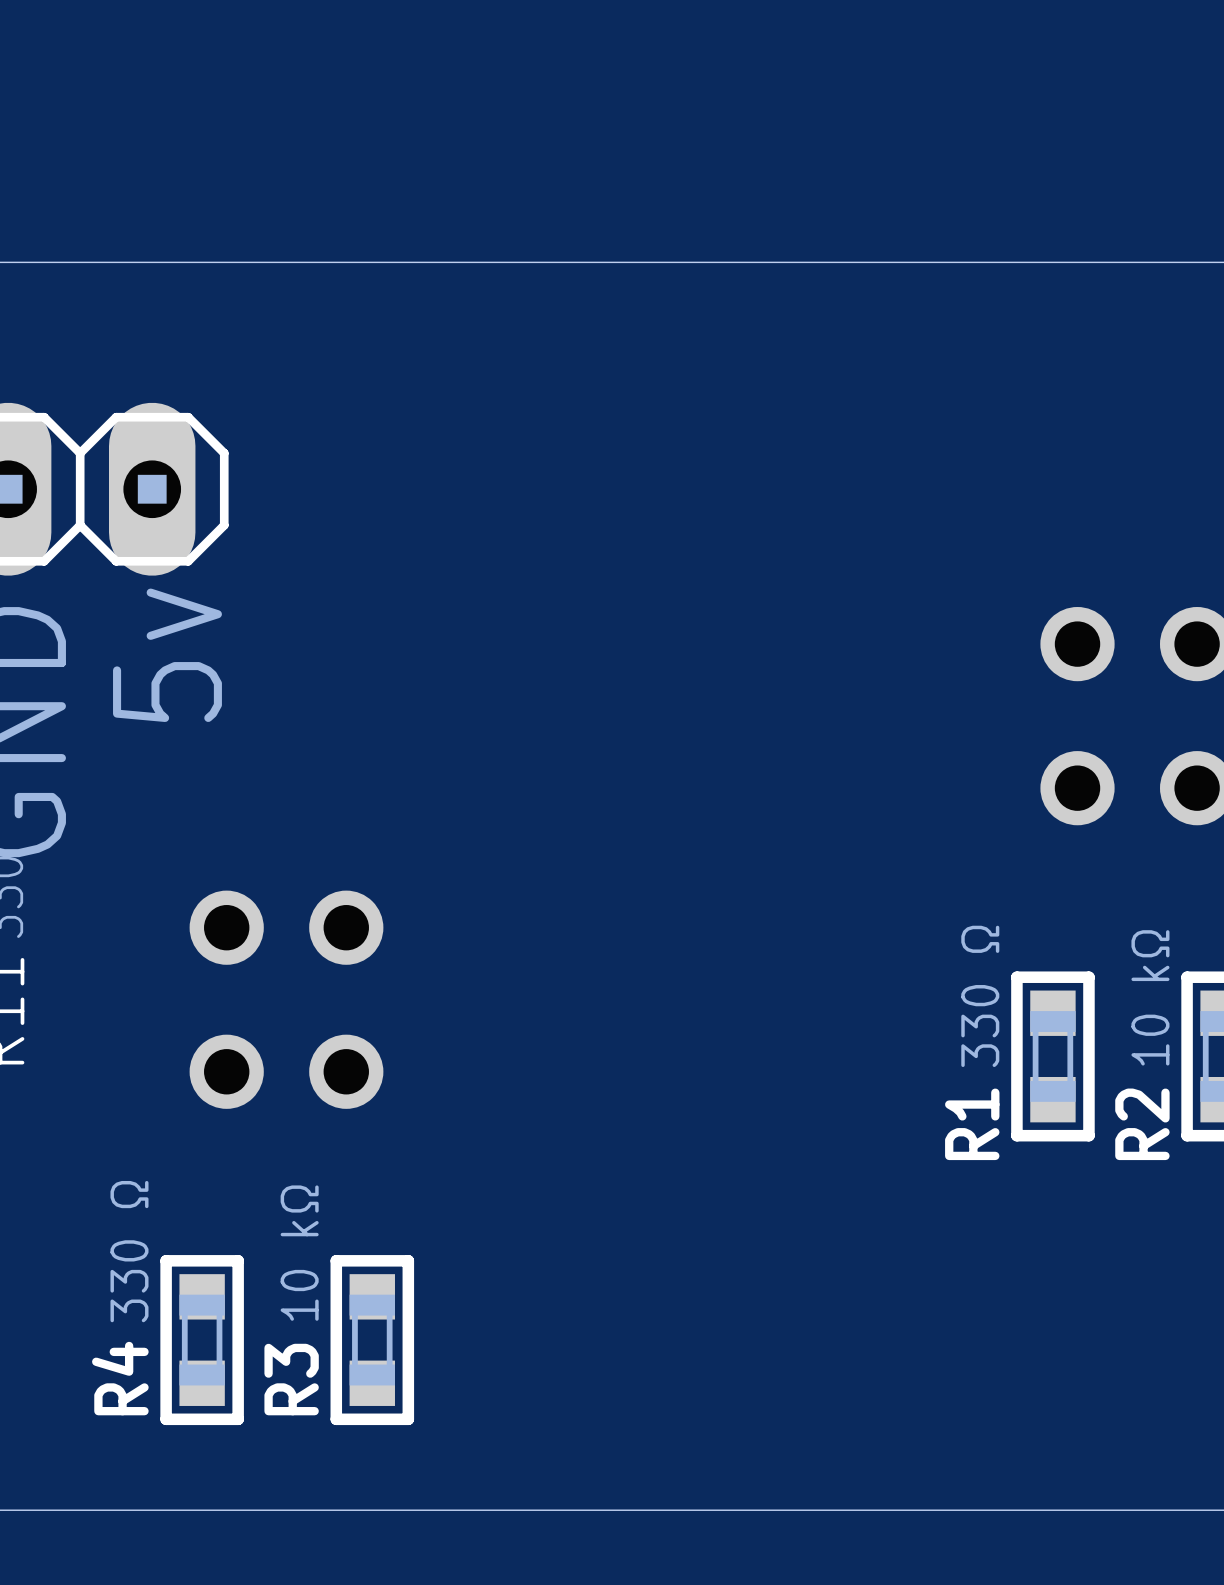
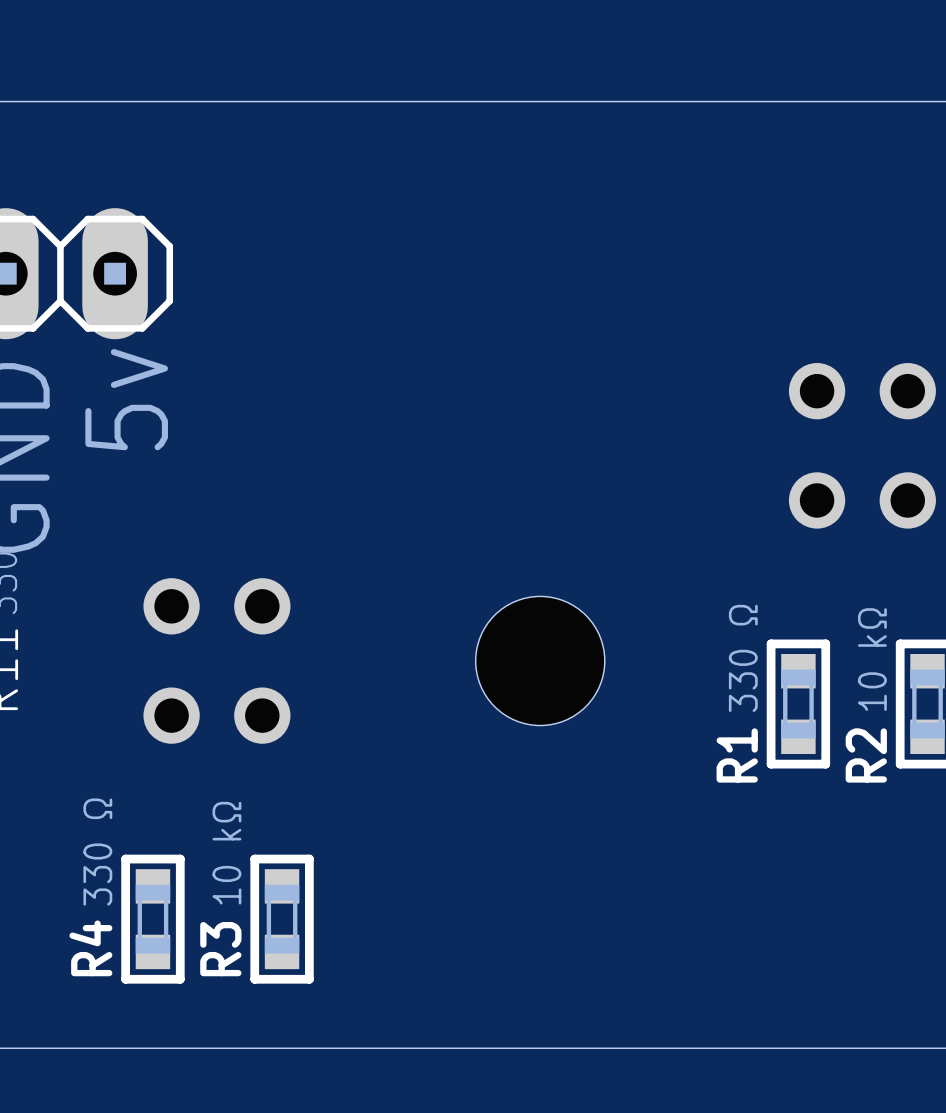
hole: none -> (540, 660)

